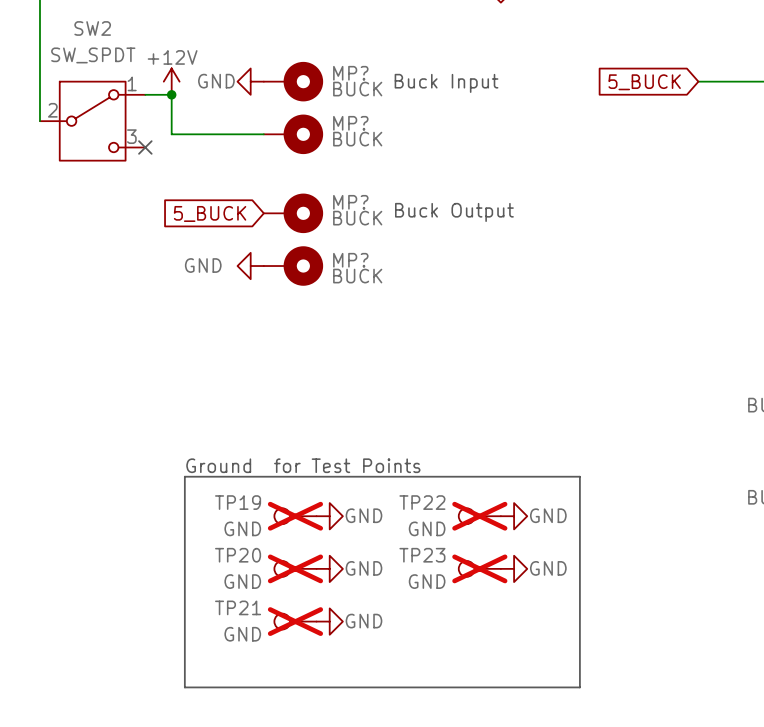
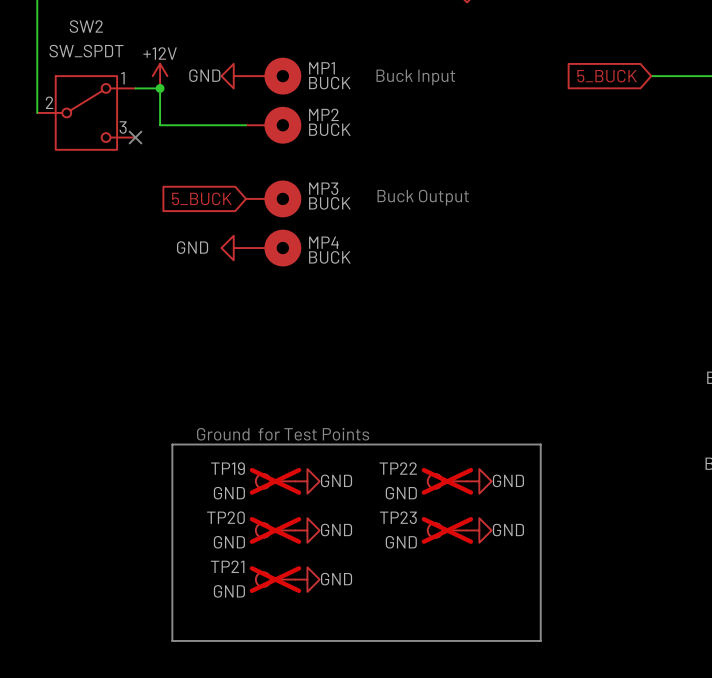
MP? name: MP? (350, 73) -> MP1 (321, 68)
MP? name: MP? (350, 123) -> MP2 (323, 114)
MP? name: MP? (350, 202) -> MP3 (323, 188)
MP? name: MP? (350, 260) -> MP4 (324, 242)

